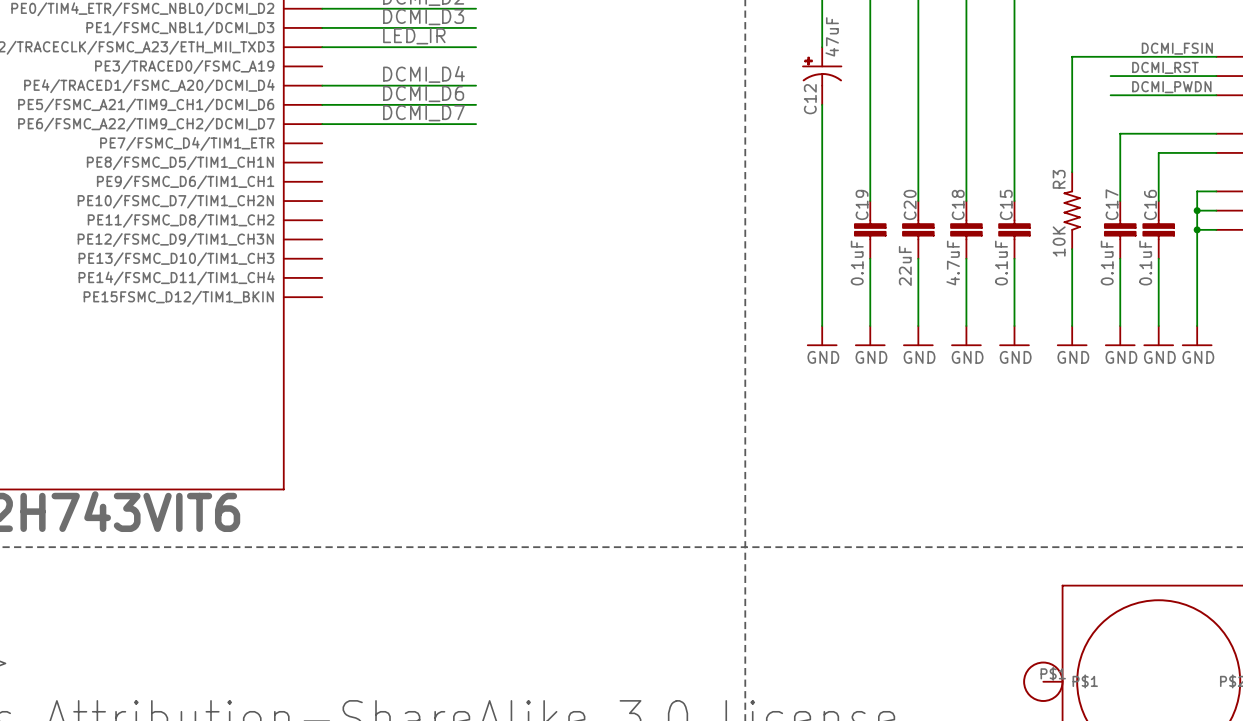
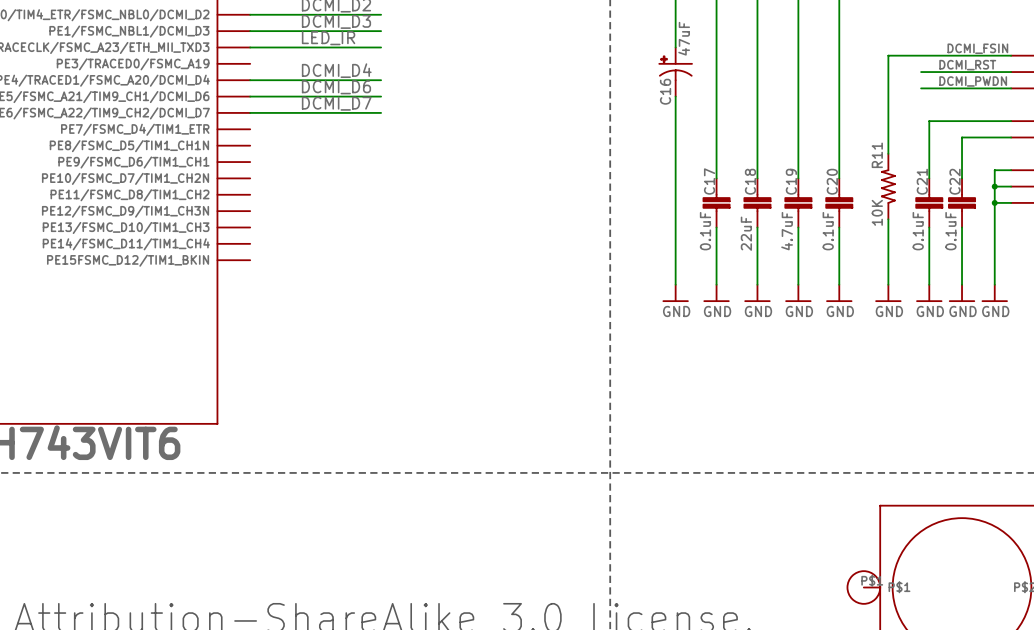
C12 name: C12 (810, 99) -> C16 (665, 91)
R3 name: R3 (1059, 179) -> R11 (877, 155)
C19 name: C19 (862, 204) -> C17 (709, 181)
C20 name: C20 (910, 204) -> C18 (750, 181)
C18 name: C18 (958, 204) -> C19 (791, 181)
C15 name: C15 (1006, 204) -> C20 (832, 181)
C17 name: C17 (1112, 204) -> C21 (922, 181)
C16 name: C16 (1150, 204) -> C22 (955, 181)

